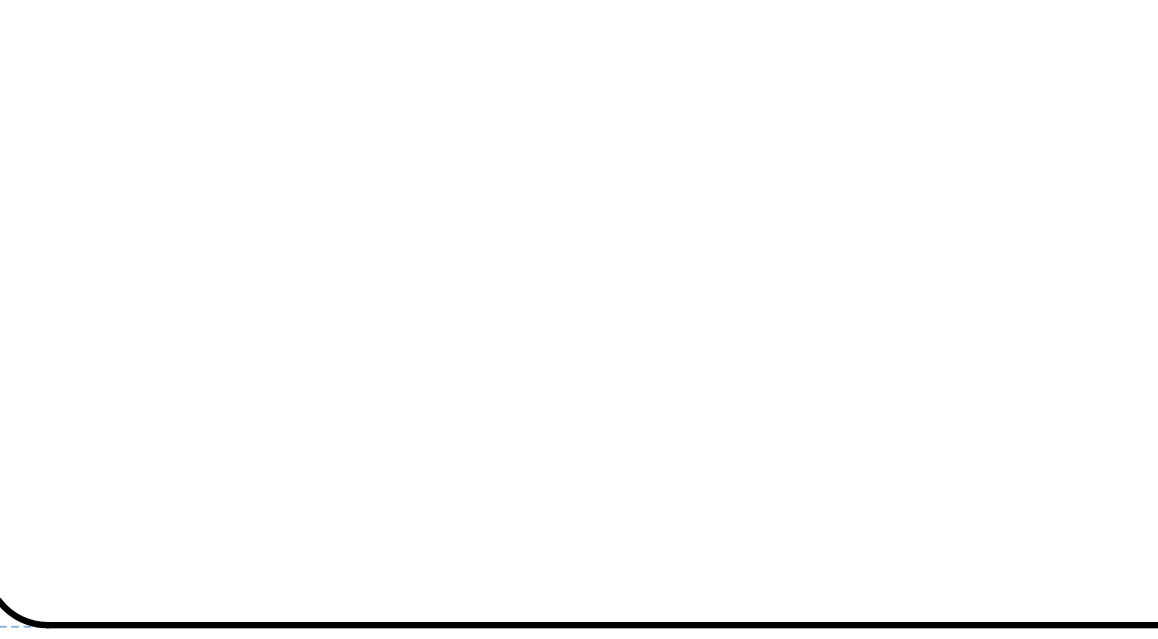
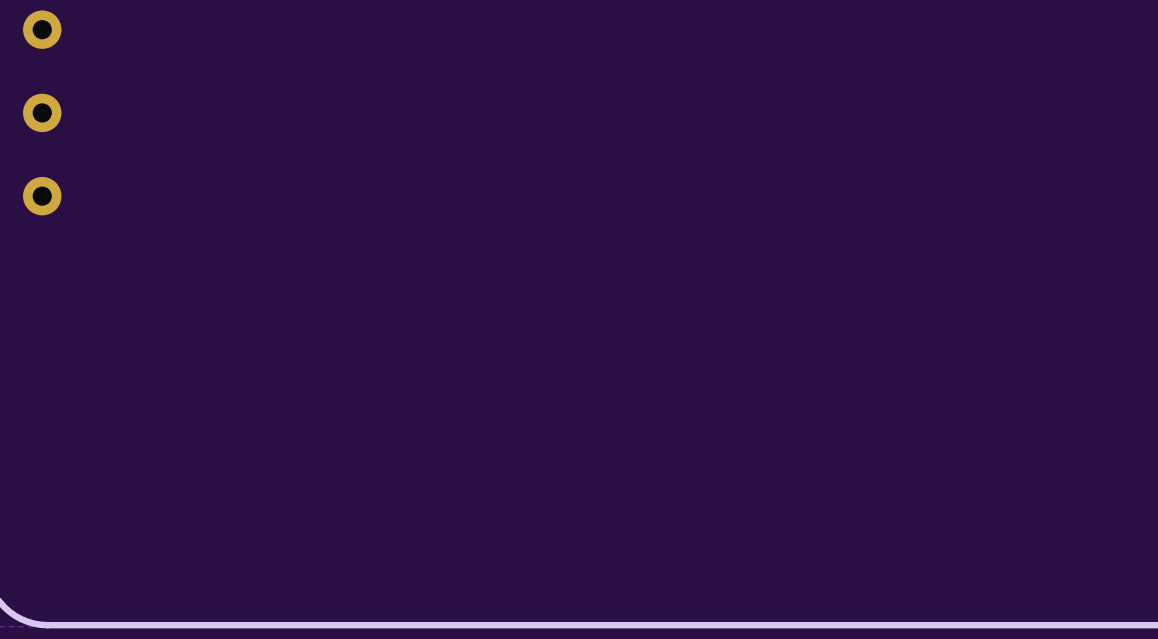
via: none -> (42, 29)
via: none -> (42, 112)
via: none -> (42, 196)

